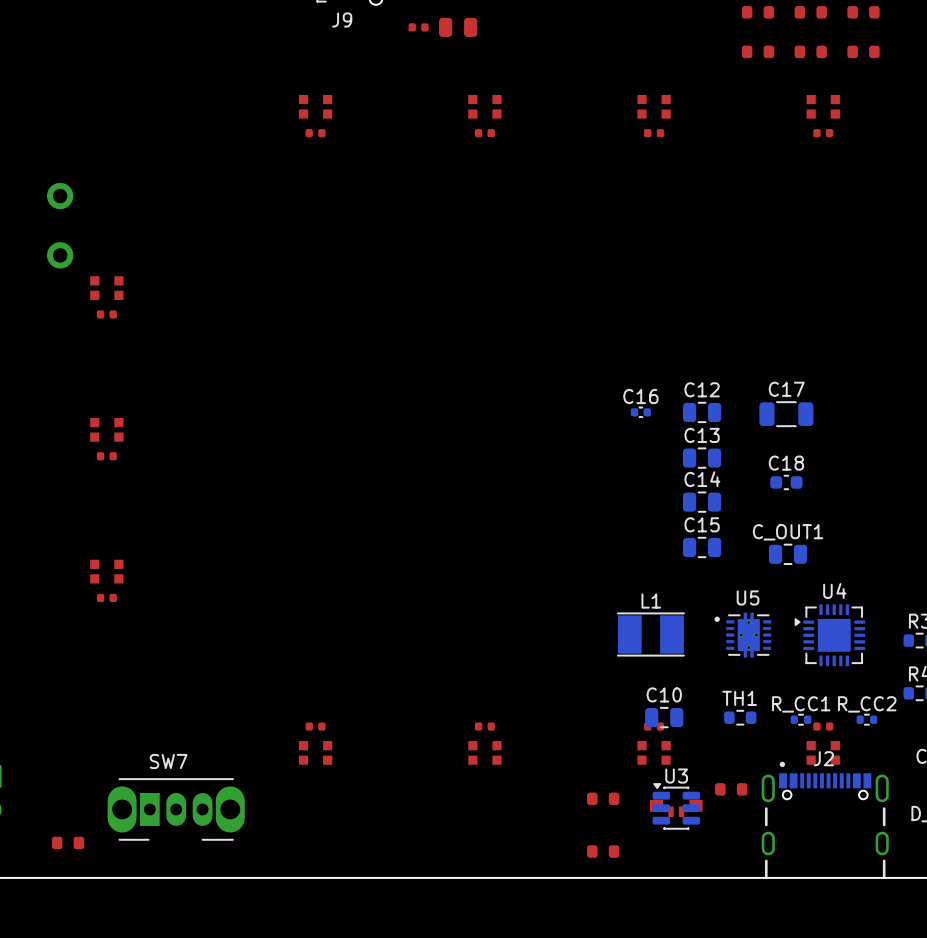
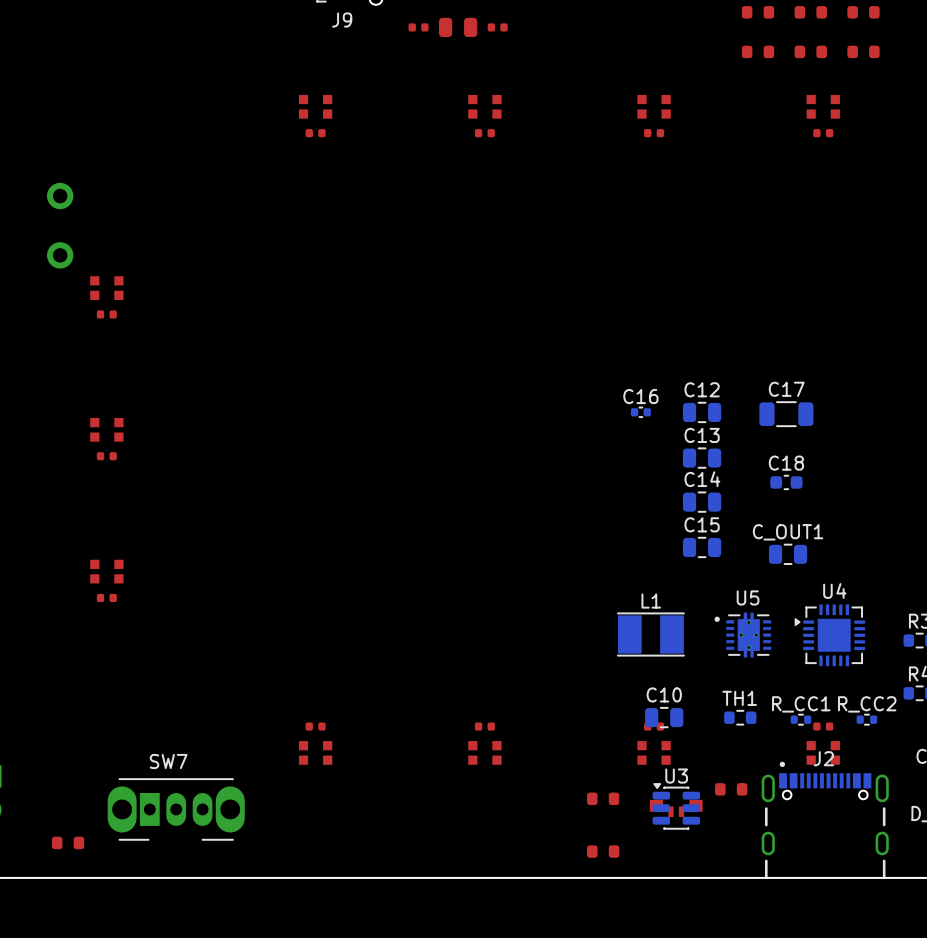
part: none -> (497, 27)

